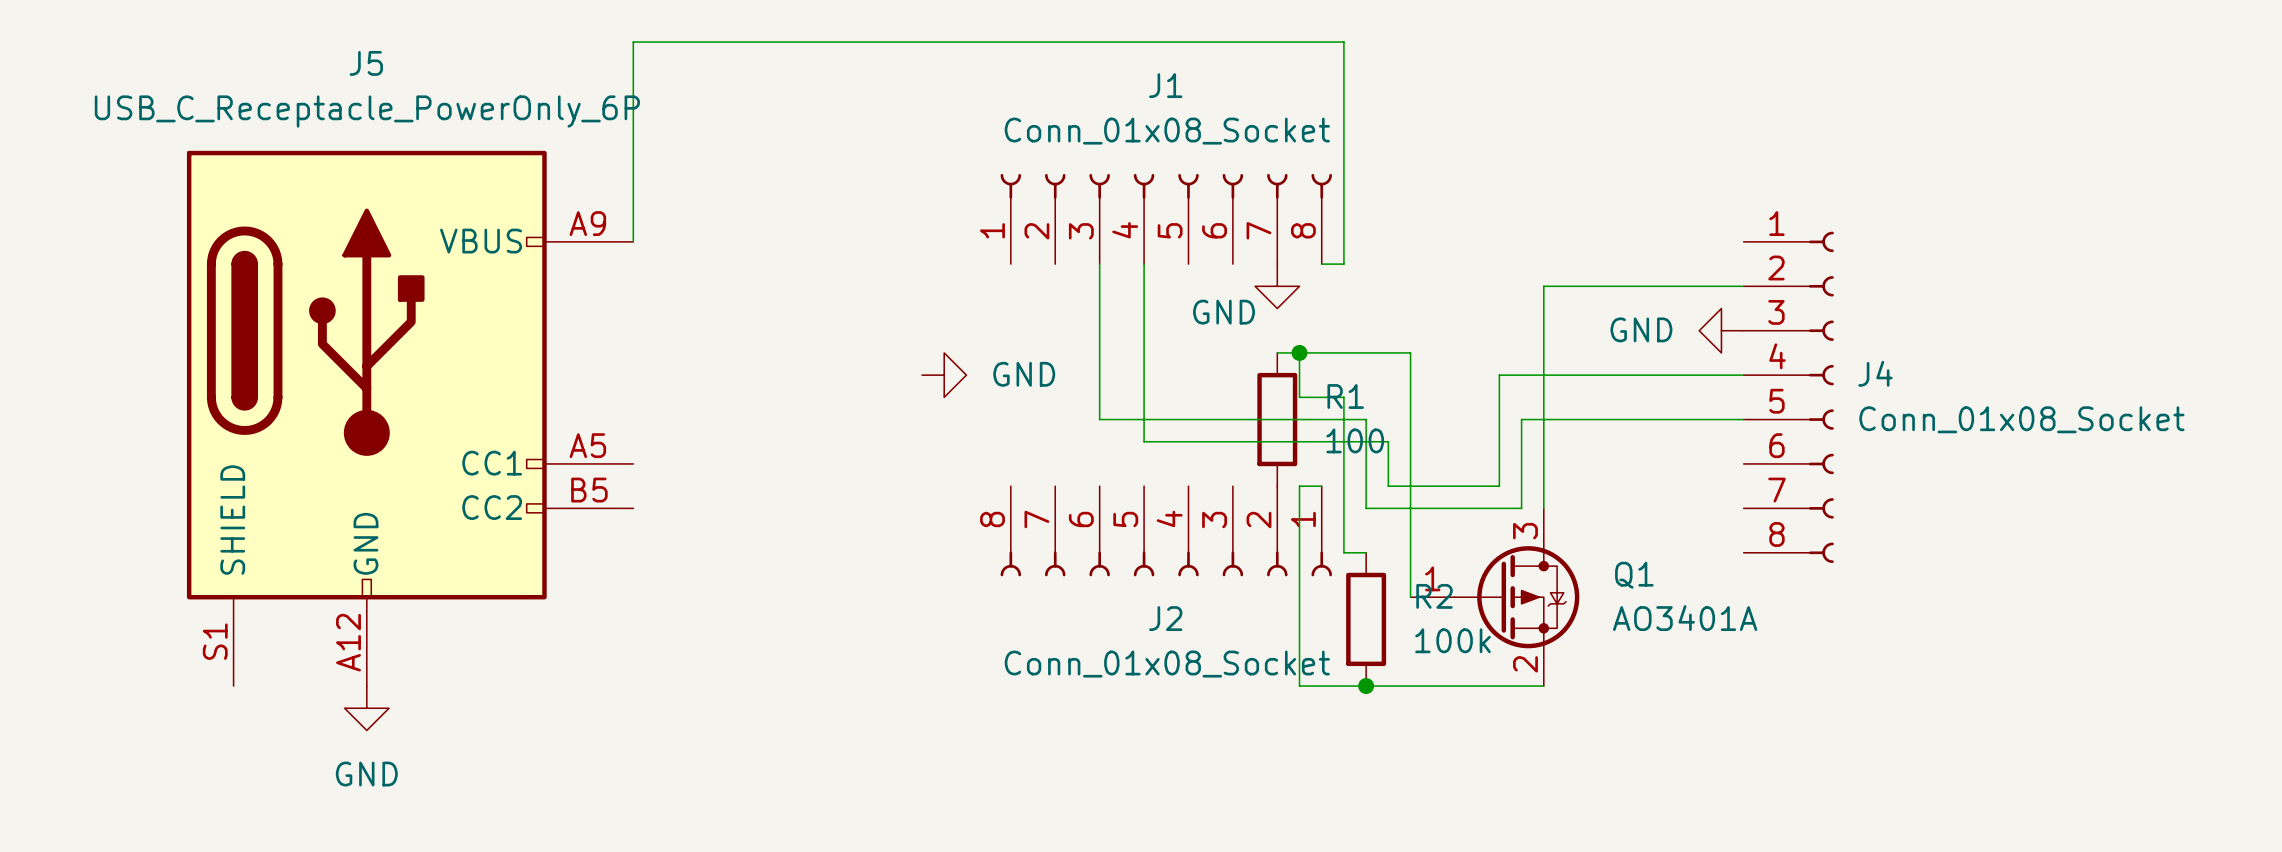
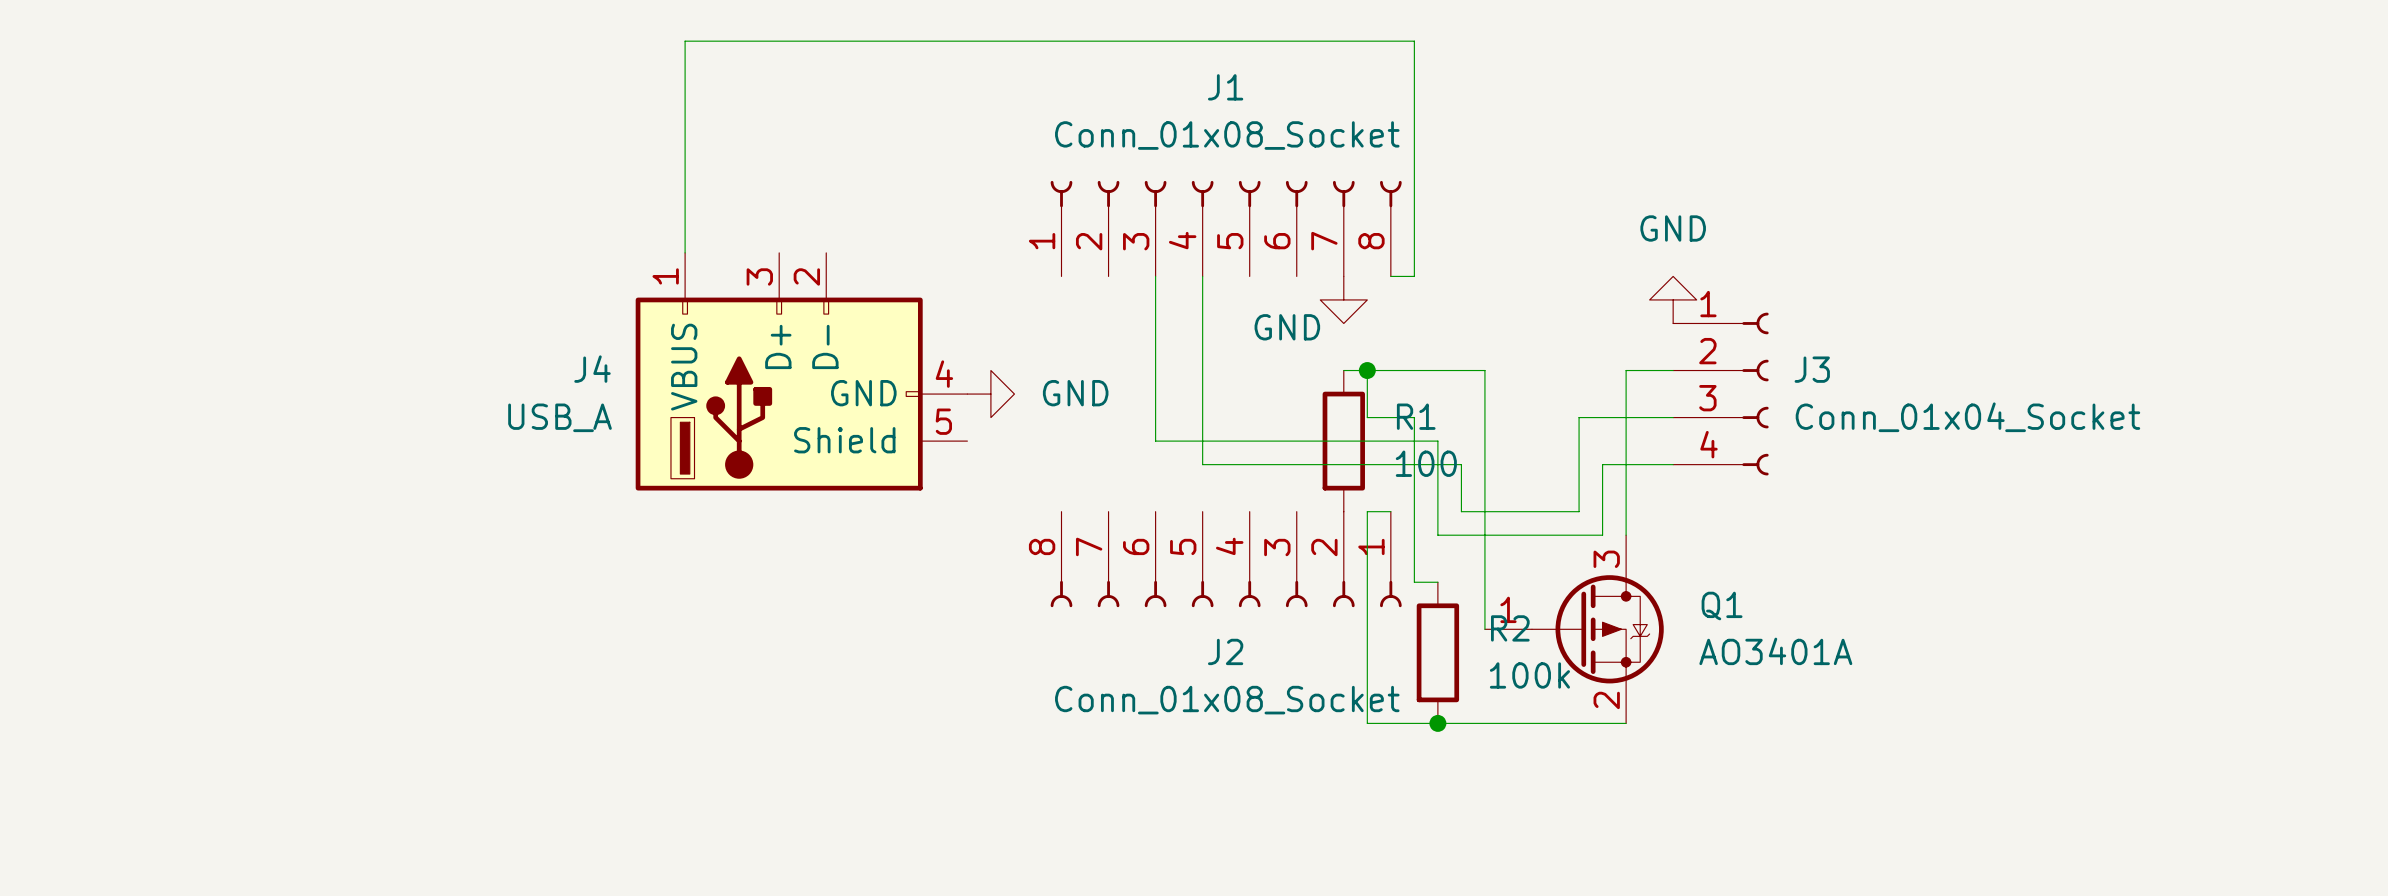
wire: (655, 42) (633, 42) (633, 241) -> (685, 41) (685, 252)
J4 symbol: [1743, 231, 1834, 564] -> [635, 252, 968, 491]
wire: (1743, 286) (1543, 286) (1543, 352) -> (1673, 370) (1626, 370)
power symbol rotation: 0° (1721, 330) -> 90° clockwise (1673, 299)
power symbol position: GND (1721, 330) -> GND (1673, 299)
J4 name position: J4 (1875, 373) -> J4 (592, 369)
J3: none -> Conn_01x04_Socket (1720, 394)
wire: (1743, 375) (1499, 375) (1499, 397) -> (1673, 417) (1579, 417)
J5: USB_C_Receptacle_PowerOnly_6P (410, 418) -> none
wire: (1743, 419) (1521, 419) (1521, 441) -> (1673, 464) (1602, 464)
J4 value: Conn_01x08_Socket (2021, 419) -> USB_A (560, 417)
power symbol: GND (366, 708) -> none

